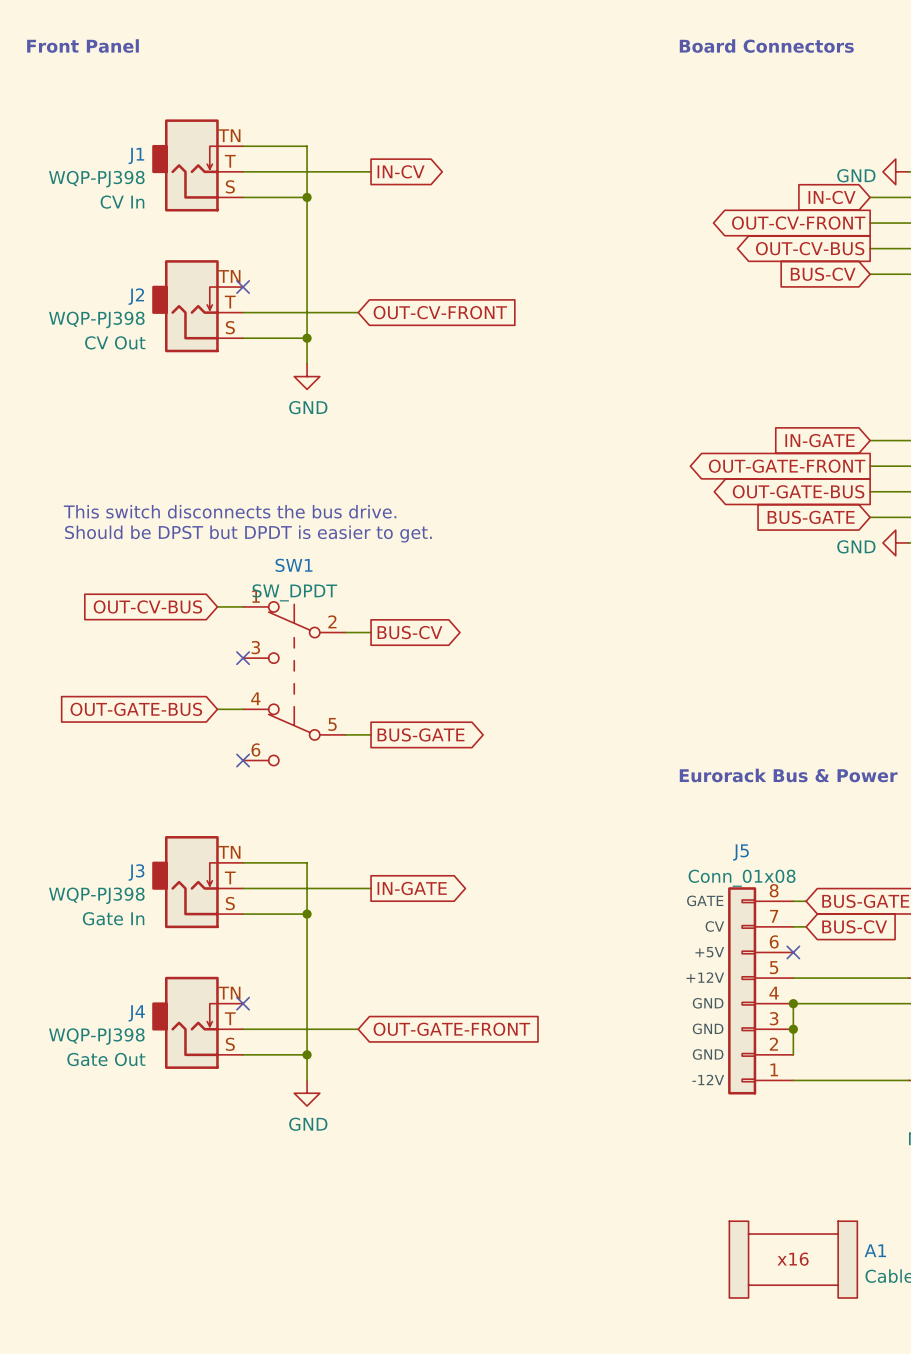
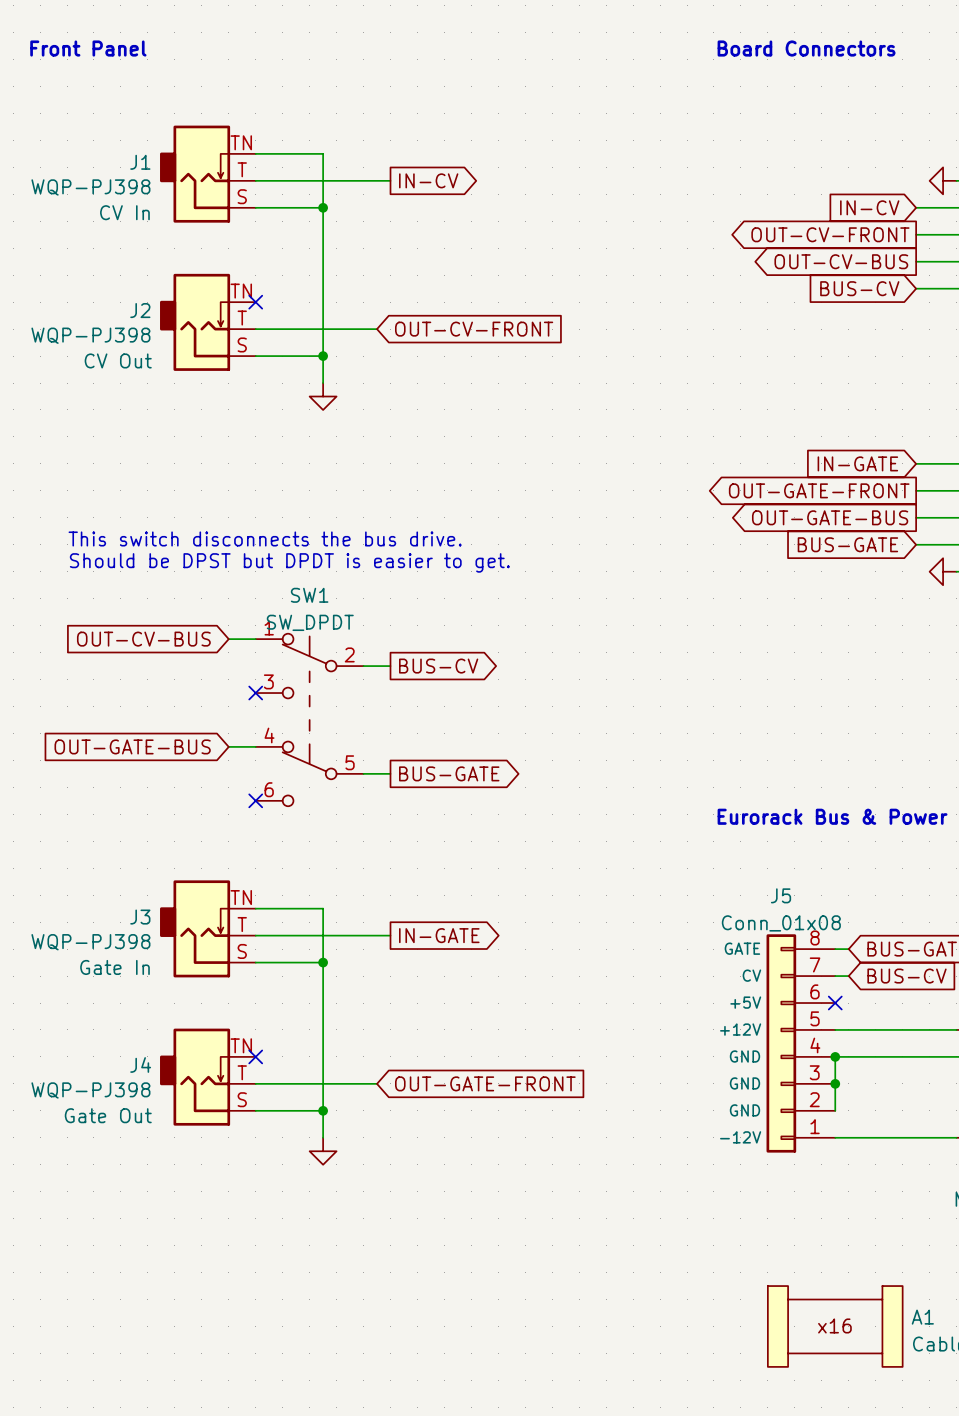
power symbol text: GND (856, 175) -> none
power symbol text: GND (308, 407) -> none
power symbol text: GND (856, 546) -> none
power symbol text: GND (308, 1124) -> none

